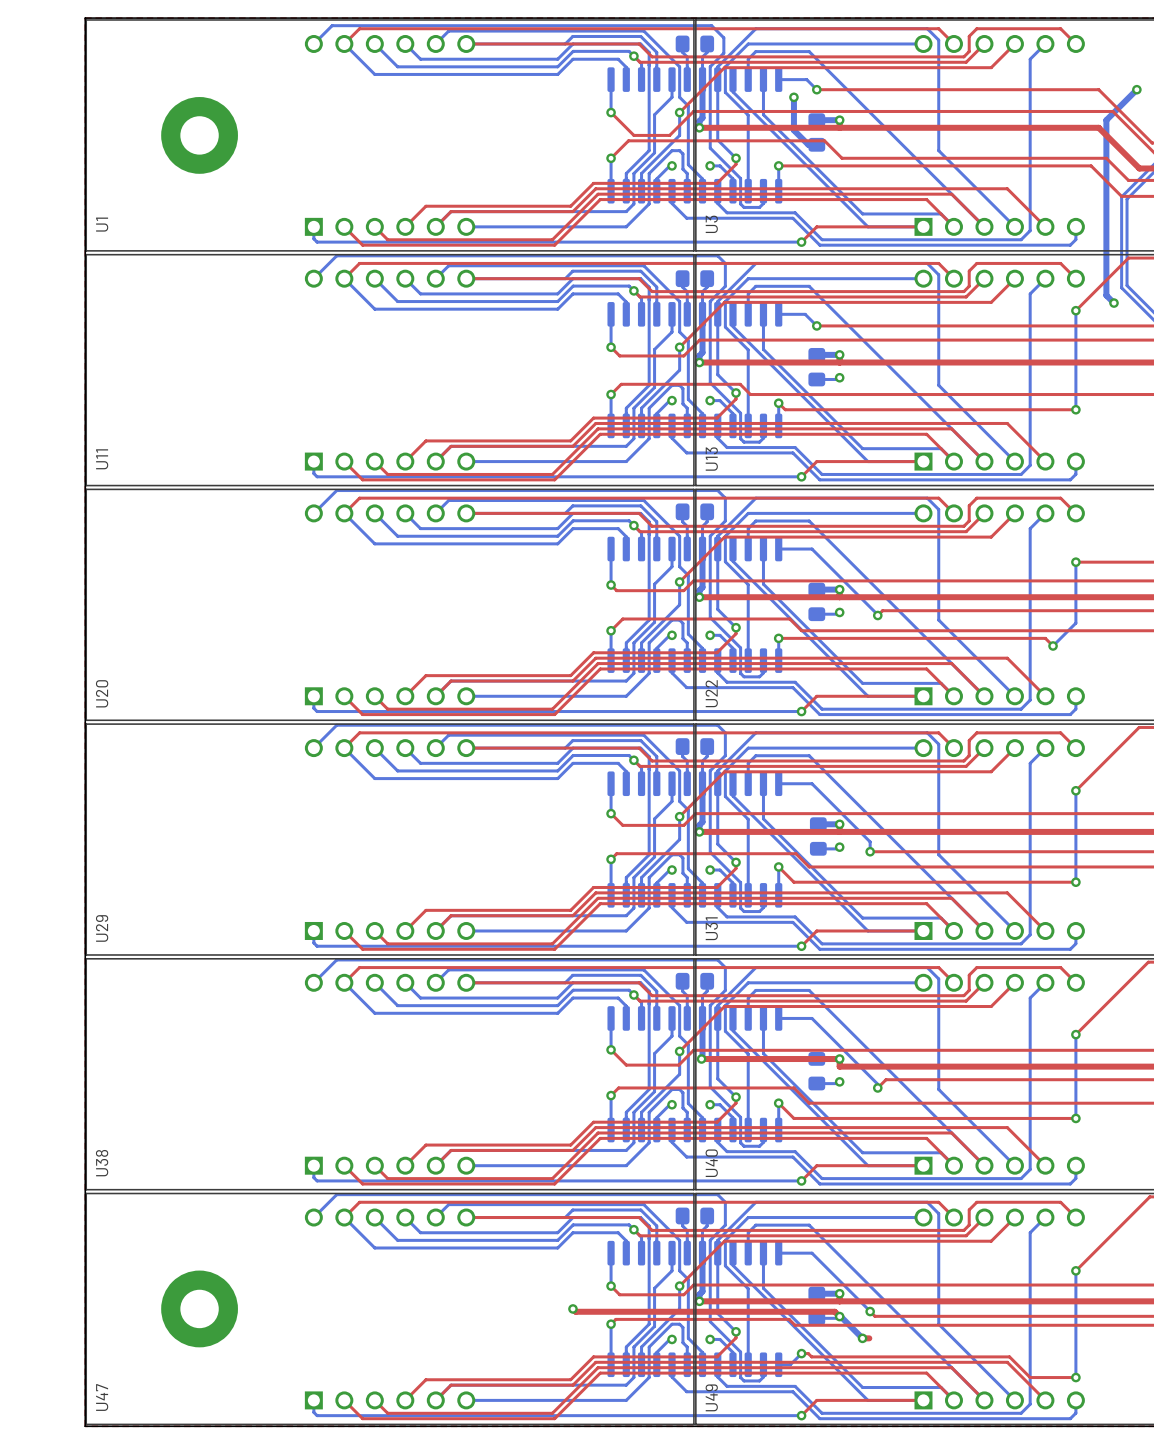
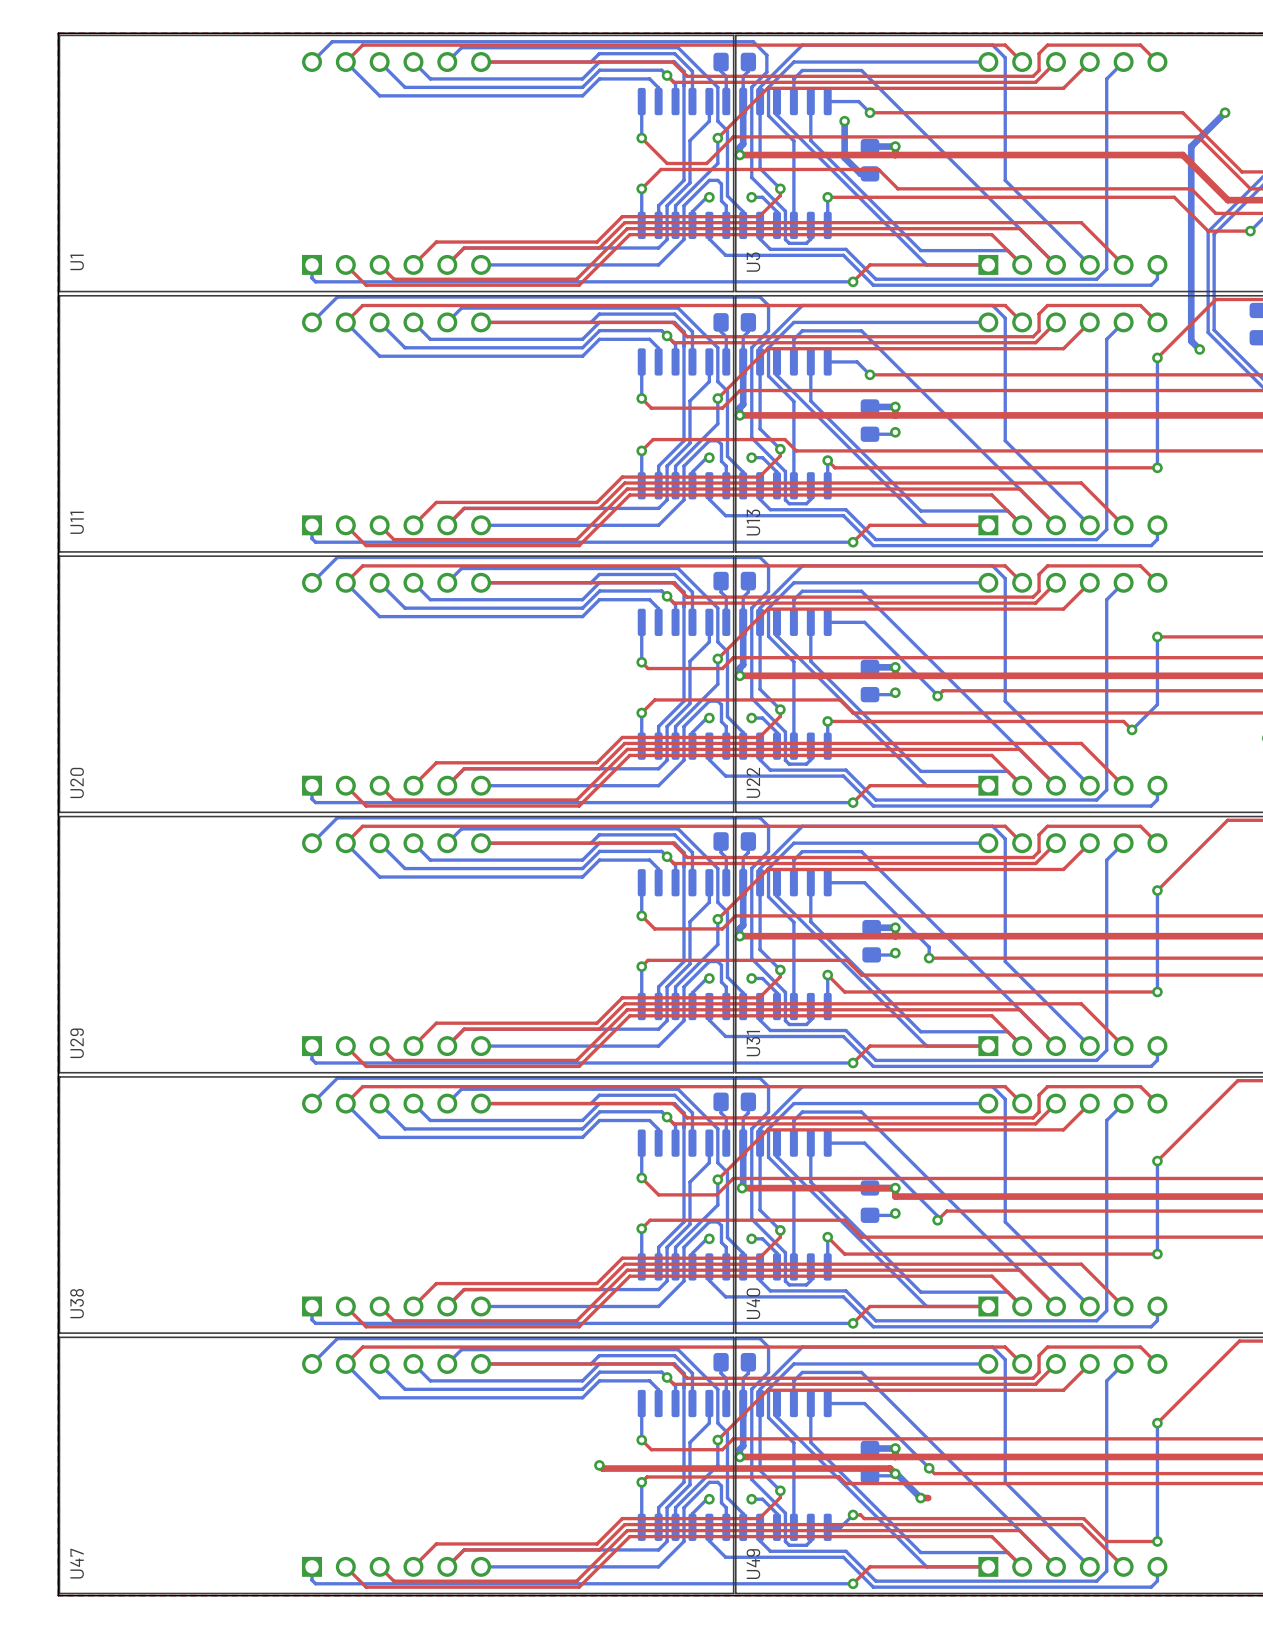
part: (199, 135) -> none
part: (199, 1308) -> none

